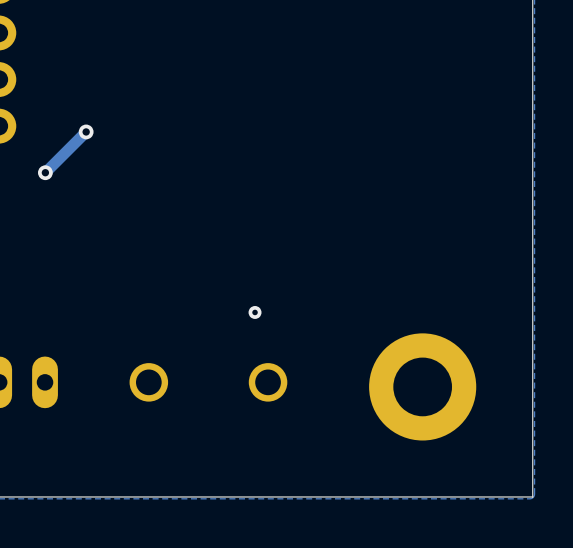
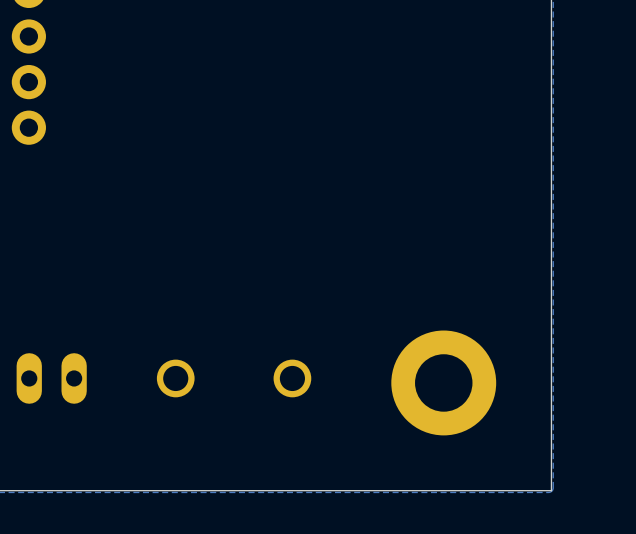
track: (86, 131) (45, 172) -> none
via: (86, 131) -> none
via: (45, 172) -> none
via: (255, 312) -> none

